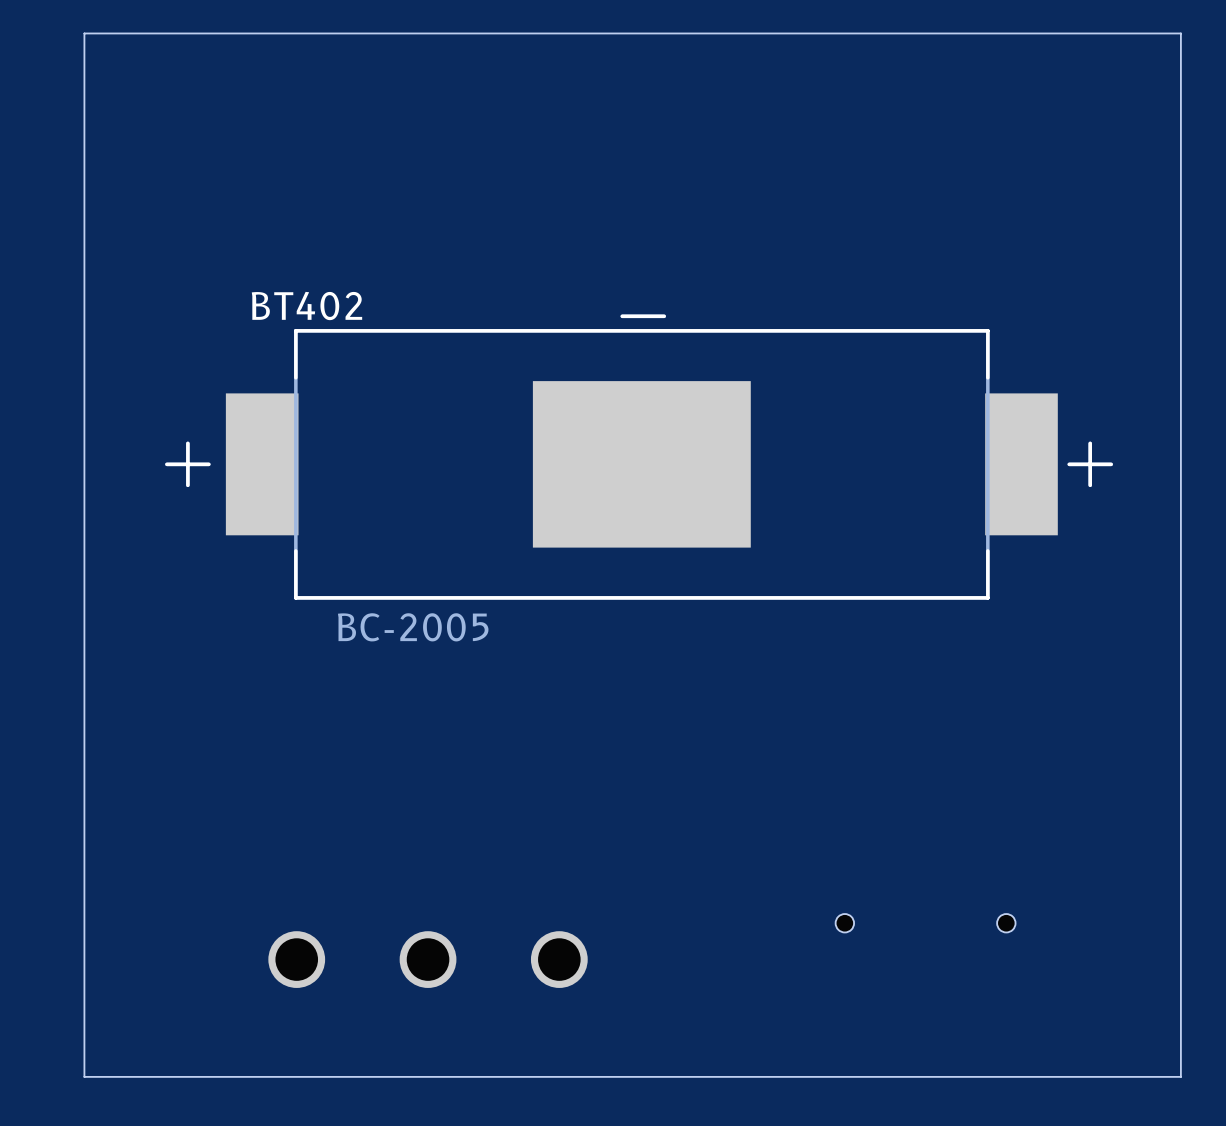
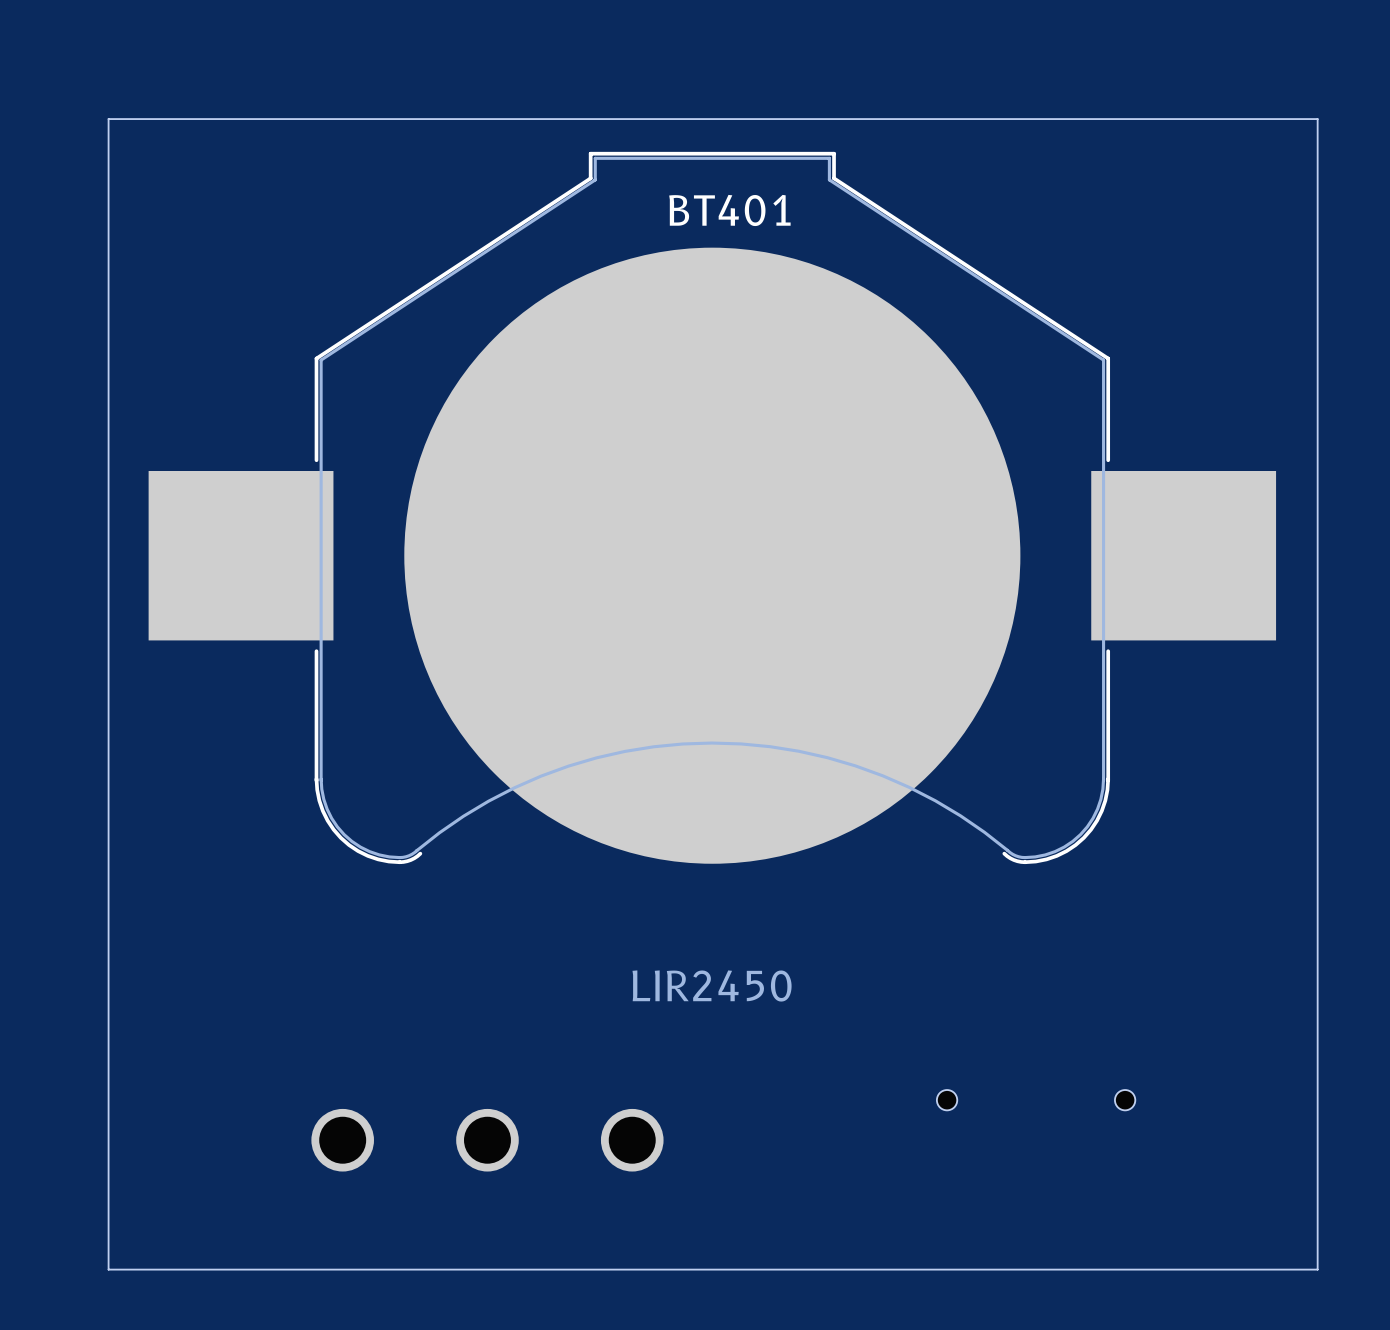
BT401: none -> LIR2450 (712, 507)
BT402: BC-2005 (639, 457) -> none

